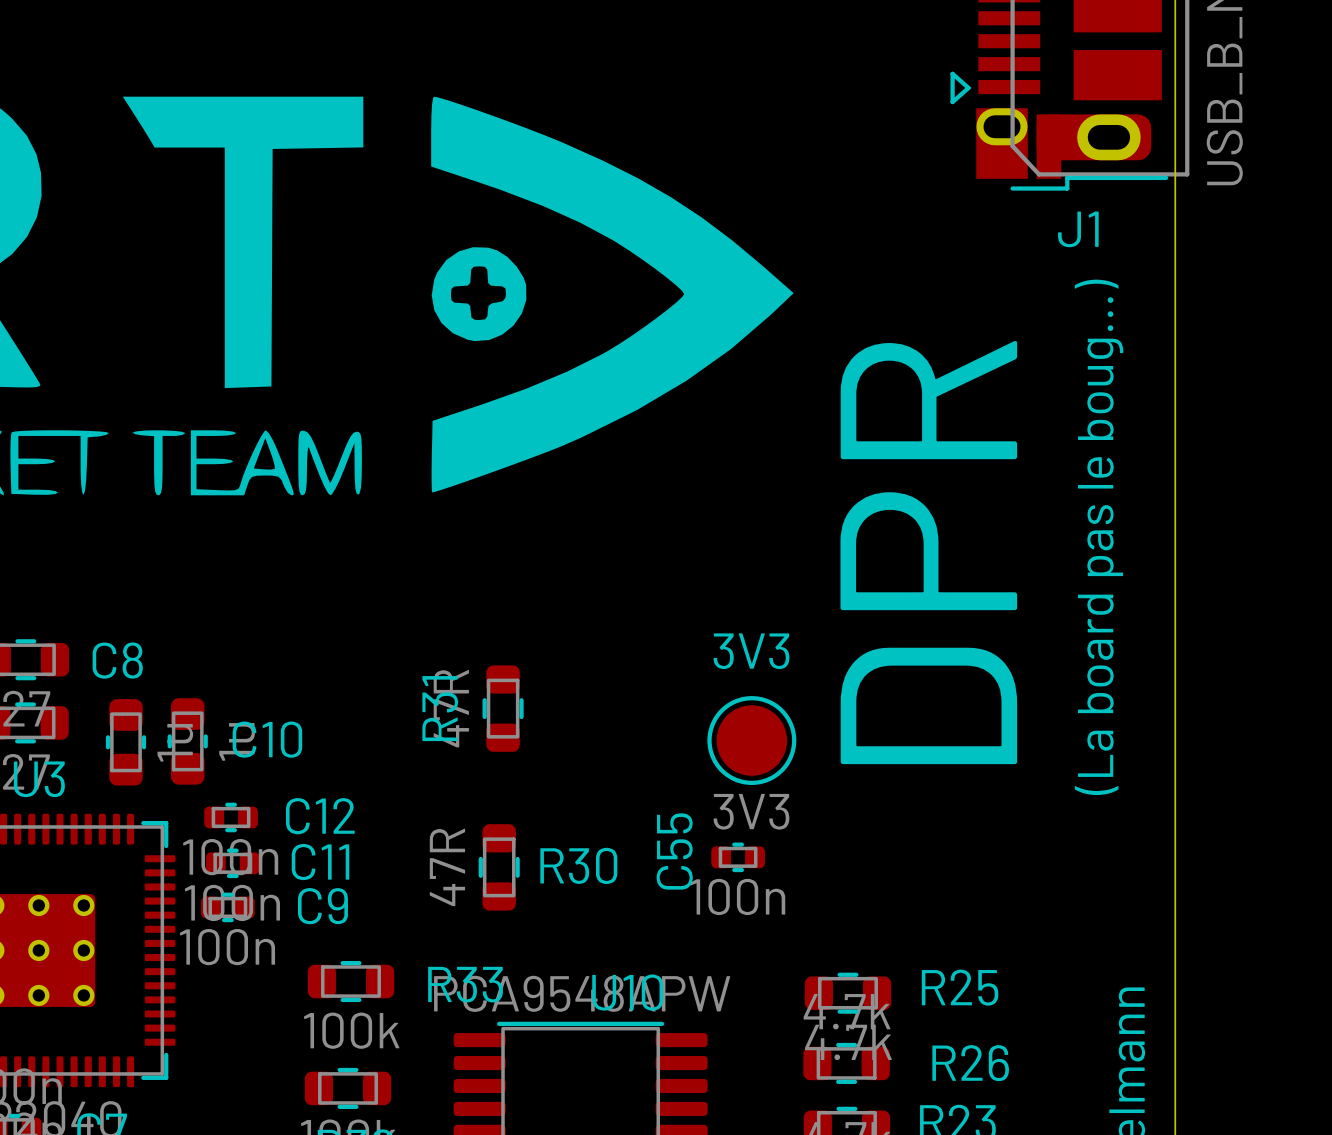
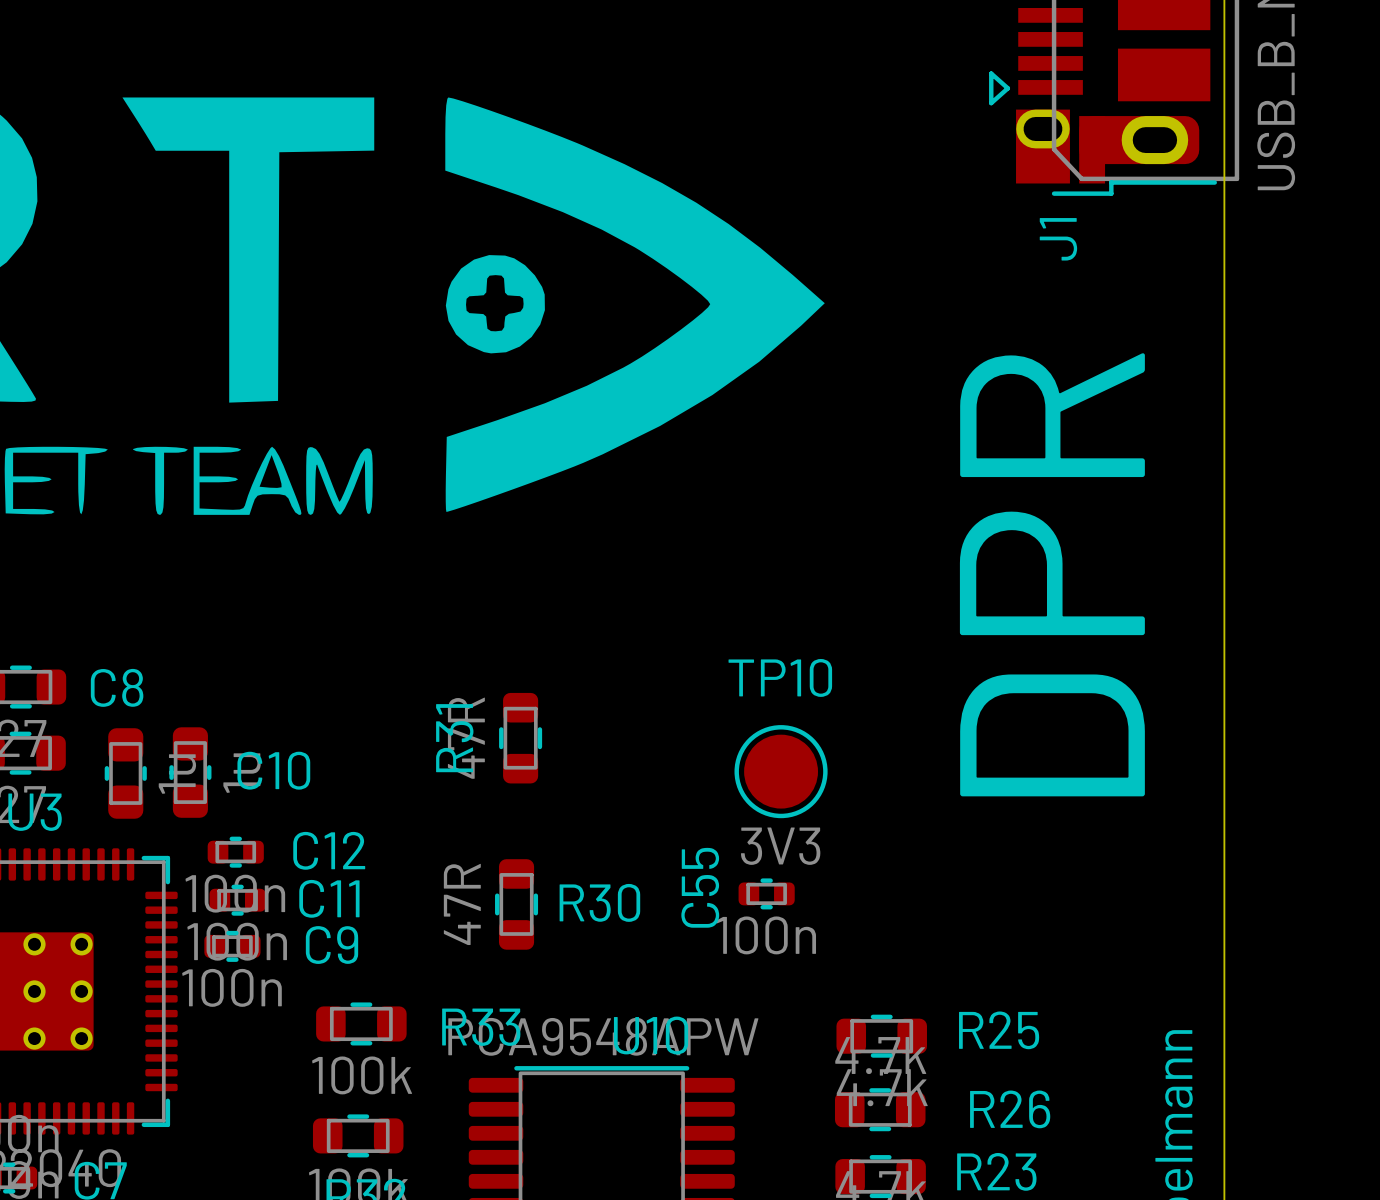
J1 name rotation: 0° (1078, 229) -> 90° counterclockwise (1058, 239)
text: (La board pas le boug...) (1099, 537) -> none
text position: DPR (928, 552) -> DPR (1052, 574)
3V3 name: 3V3 (751, 651) -> TP10 (780, 677)

